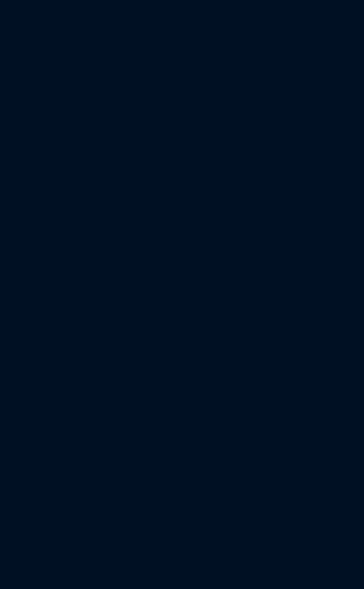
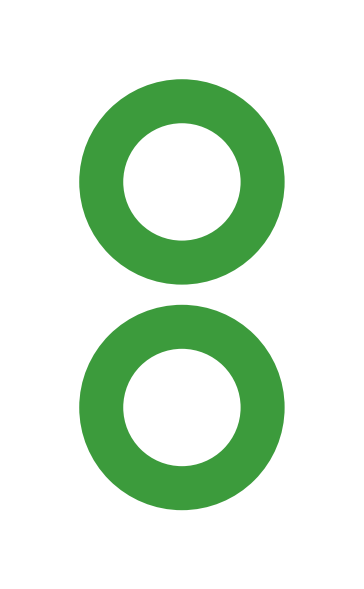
part: none -> (181, 181)
part: none -> (181, 407)

